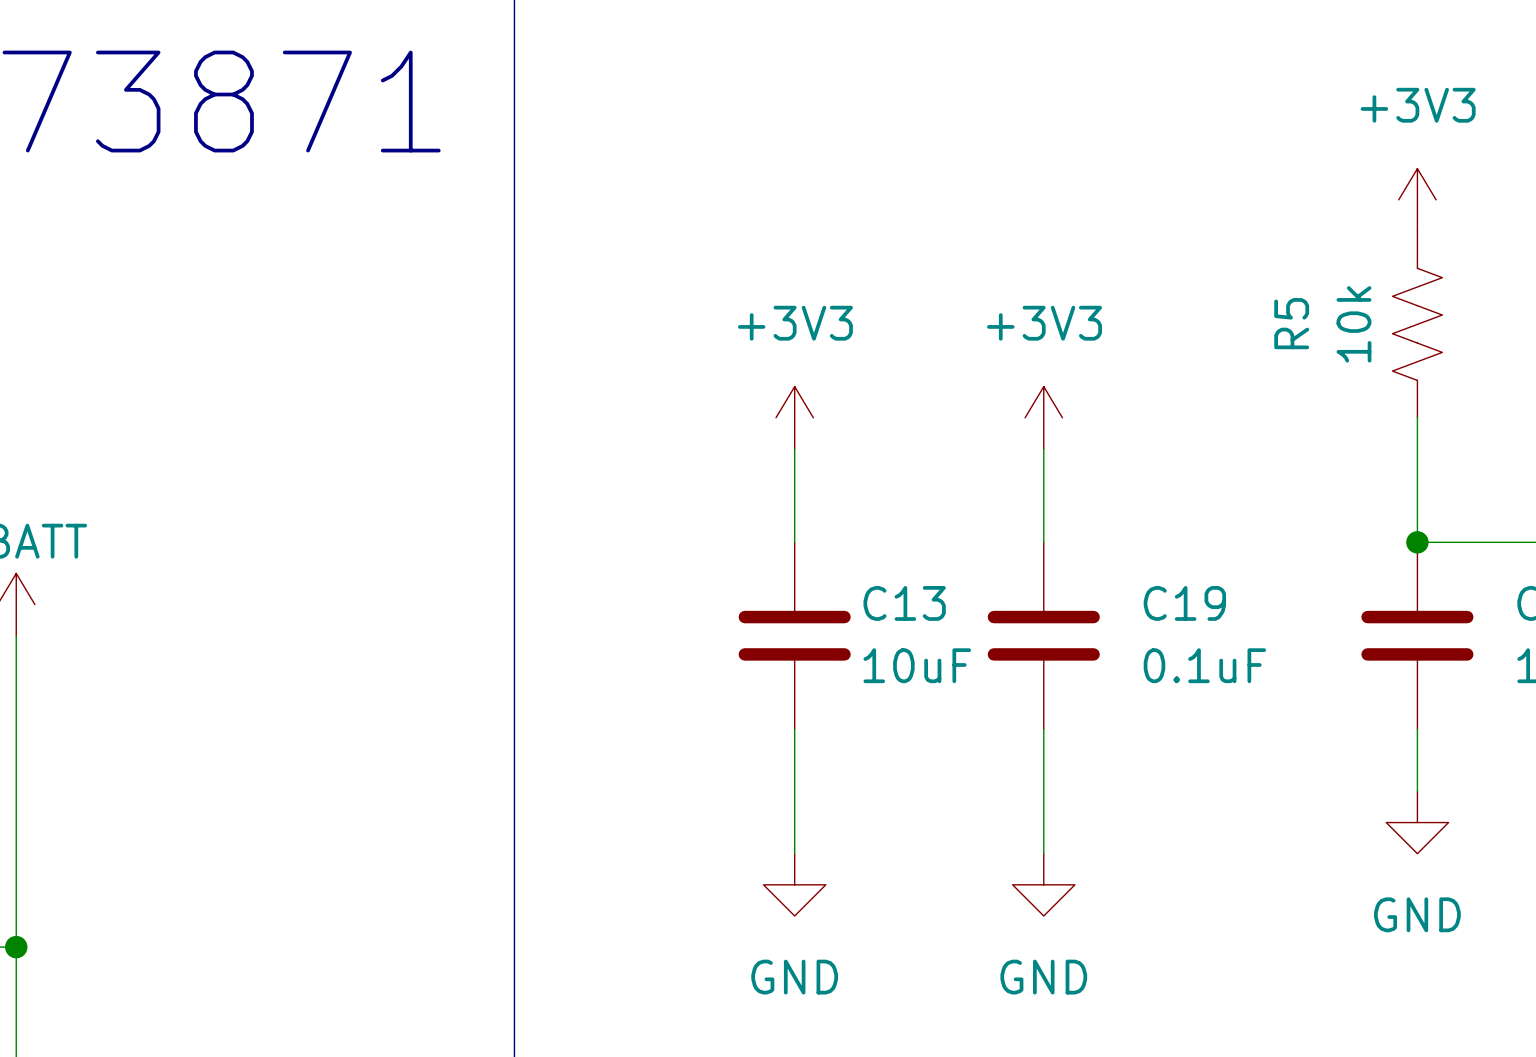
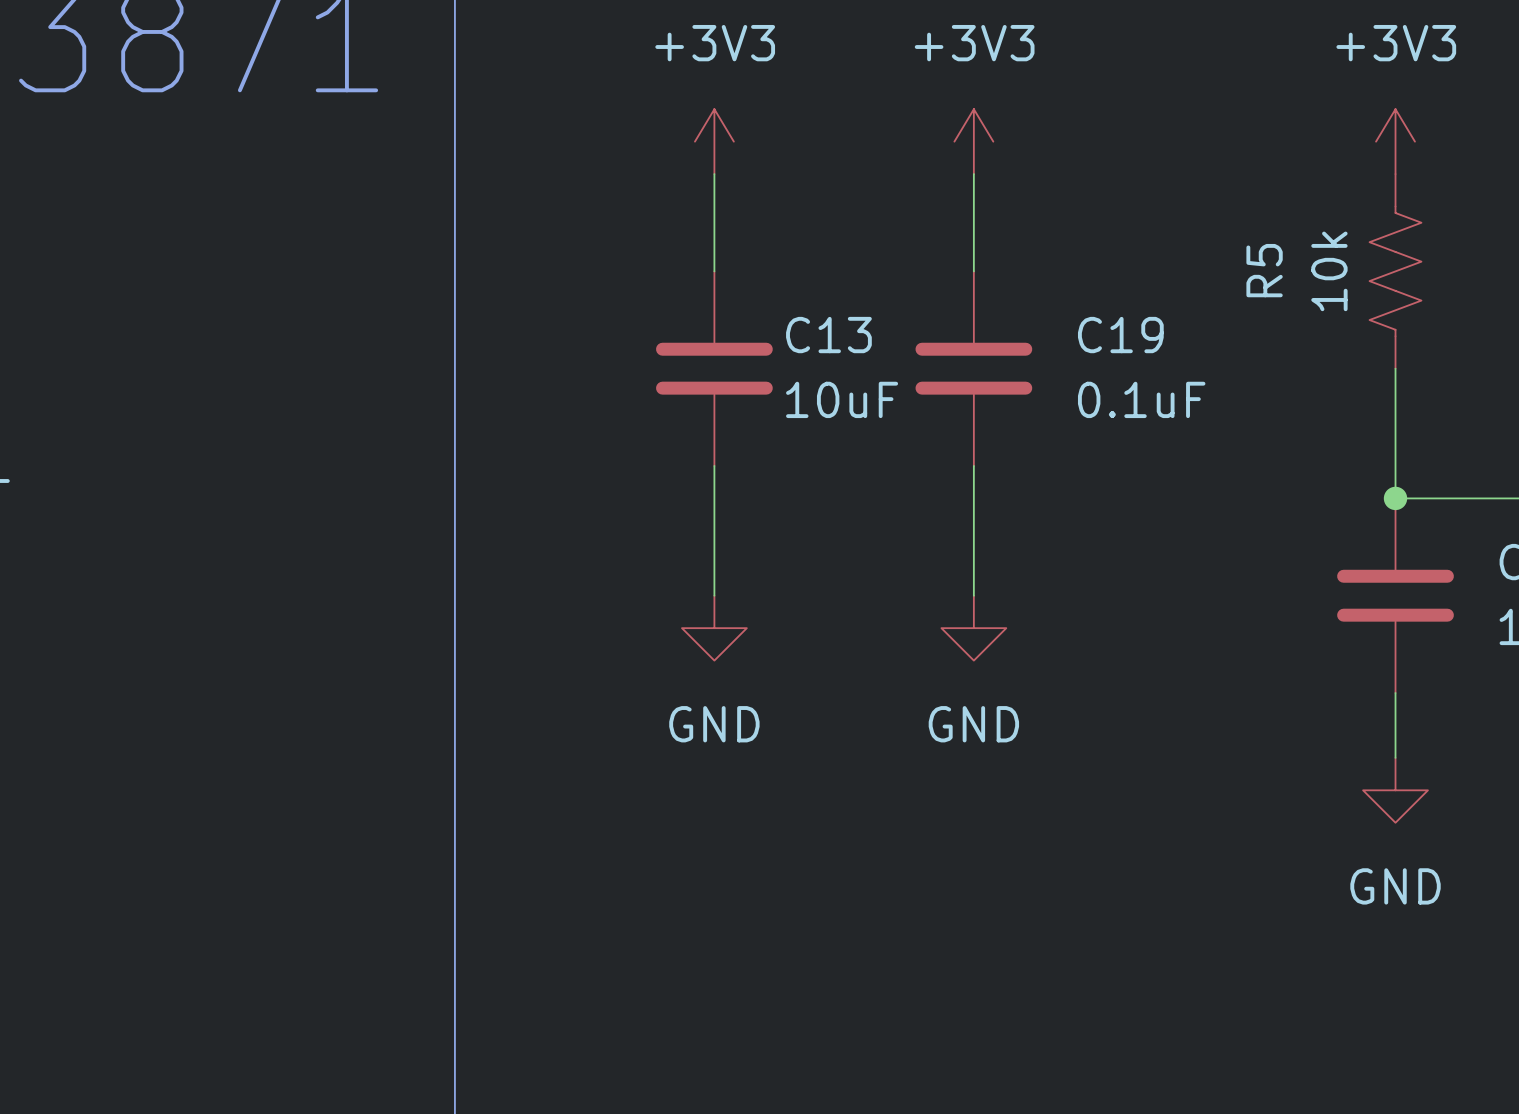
power symbol: none -> +3V3 (714, 141)
power symbol: none -> +3V3 (973, 141)
power symbol: +3V3 (794, 417) -> none
power symbol: +3V3 (1043, 417) -> none
wire: (794, 448) (794, 542) -> (714, 174) (714, 271)
wire: (1043, 448) (1043, 542) -> (973, 174) (973, 271)
C13 position: (794, 635) -> (714, 368)
C19 position: (1043, 635) -> (973, 368)
power symbol: none -> GND (714, 628)
power symbol: none -> GND (973, 628)
wire: (794, 729) (794, 853) -> (714, 465) (714, 595)
wire: (1043, 729) (1043, 853) -> (973, 465) (973, 595)
power symbol: GND (794, 884) -> none
power symbol: GND (1043, 884) -> none

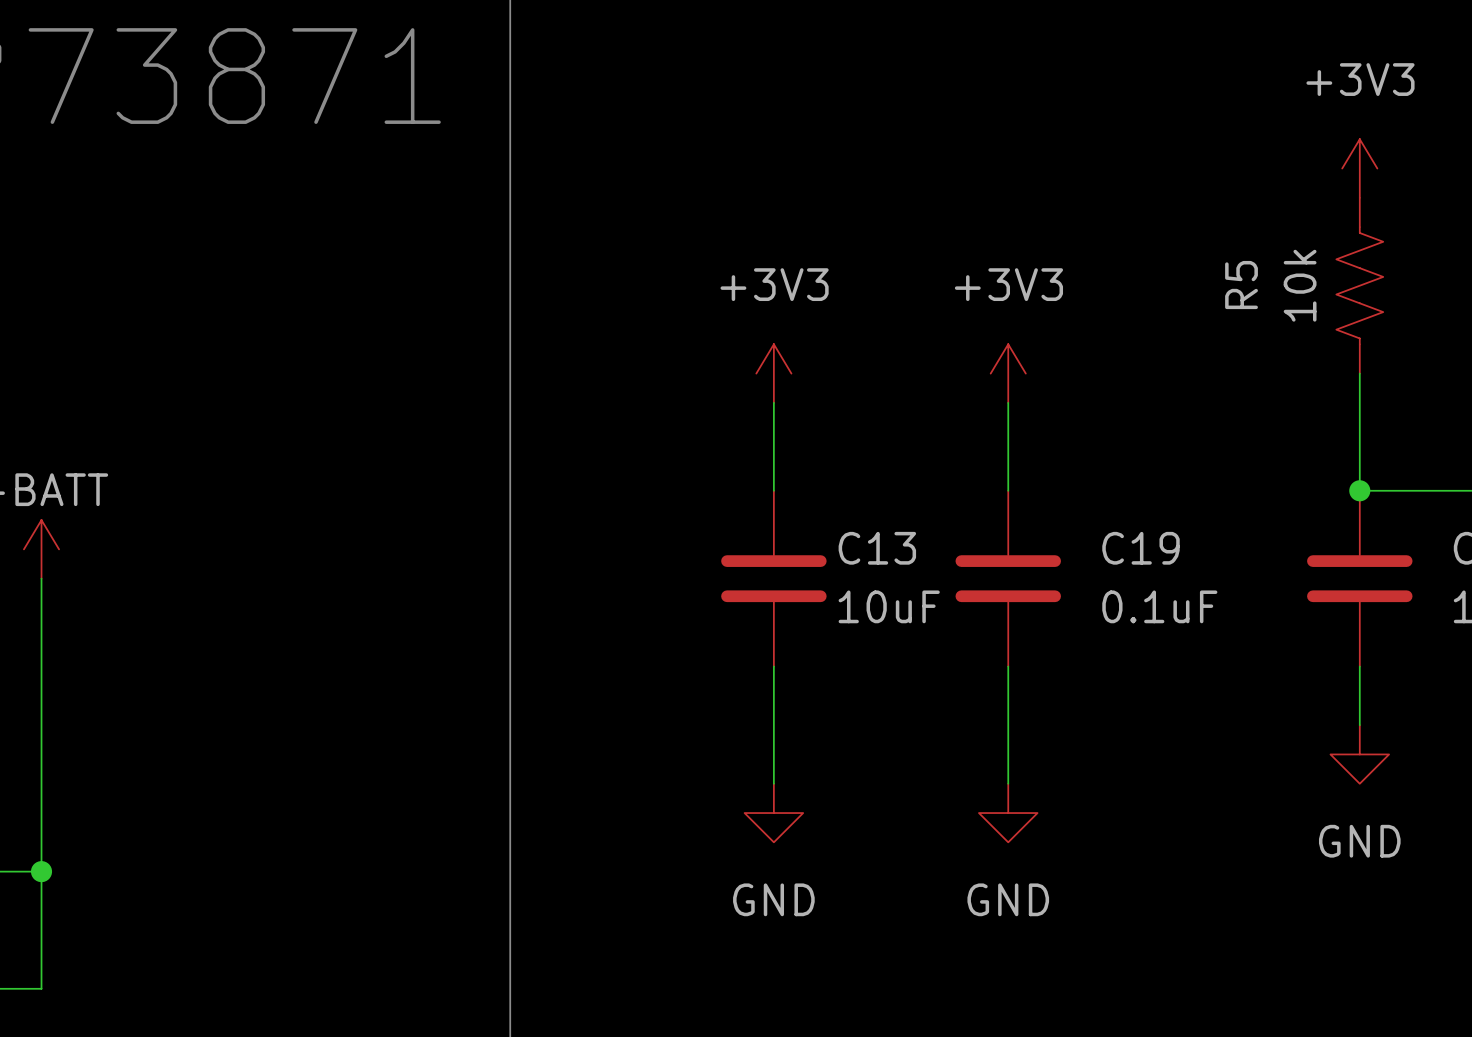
power symbol: +3V3 (714, 141) -> none
power symbol: +3V3 (973, 141) -> none
wire: (714, 174) (714, 271) -> (773, 402) (773, 490)
wire: (973, 174) (973, 271) -> (1008, 402) (1008, 490)
C13 position: (714, 368) -> (773, 578)
power symbol: none -> +3V3 (773, 373)
C19 position: (973, 368) -> (1008, 578)
power symbol: none -> +3V3 (1008, 373)
wire: (714, 465) (714, 595) -> (773, 666) (773, 783)
wire: (973, 465) (973, 595) -> (1008, 666) (1008, 783)
power symbol: GND (714, 628) -> none
power symbol: GND (973, 628) -> none
power symbol: none -> GND (773, 813)
power symbol: none -> GND (1008, 813)

